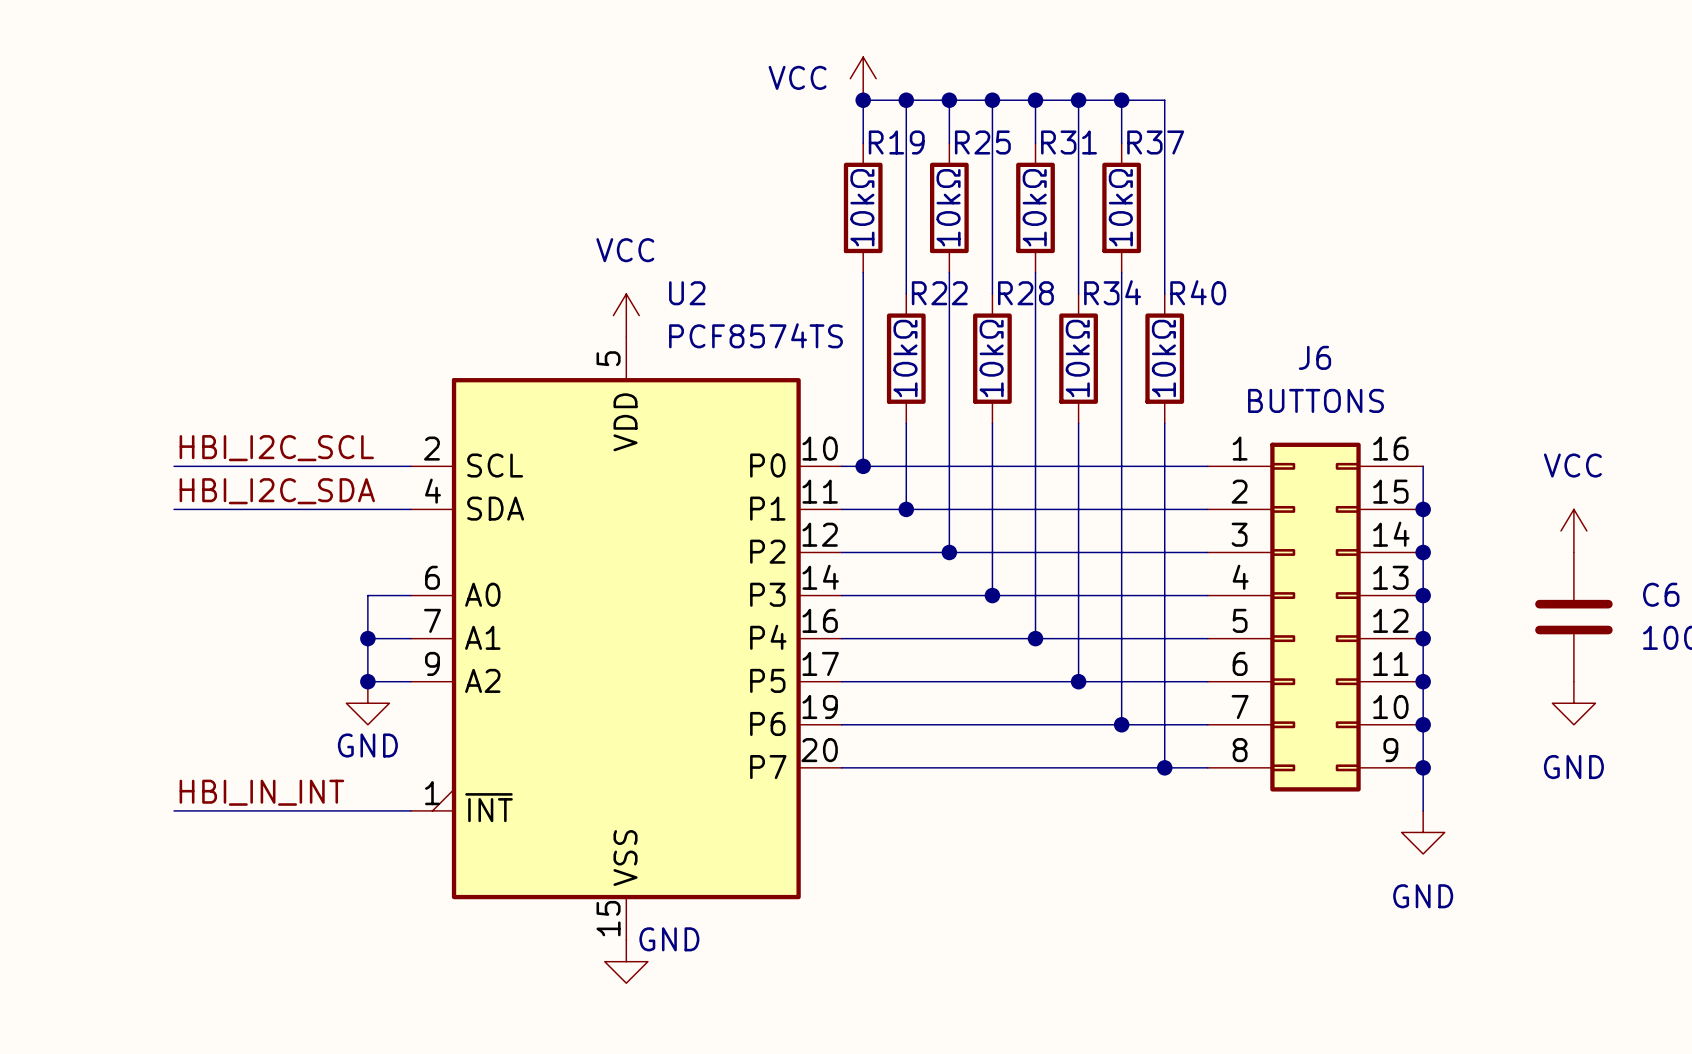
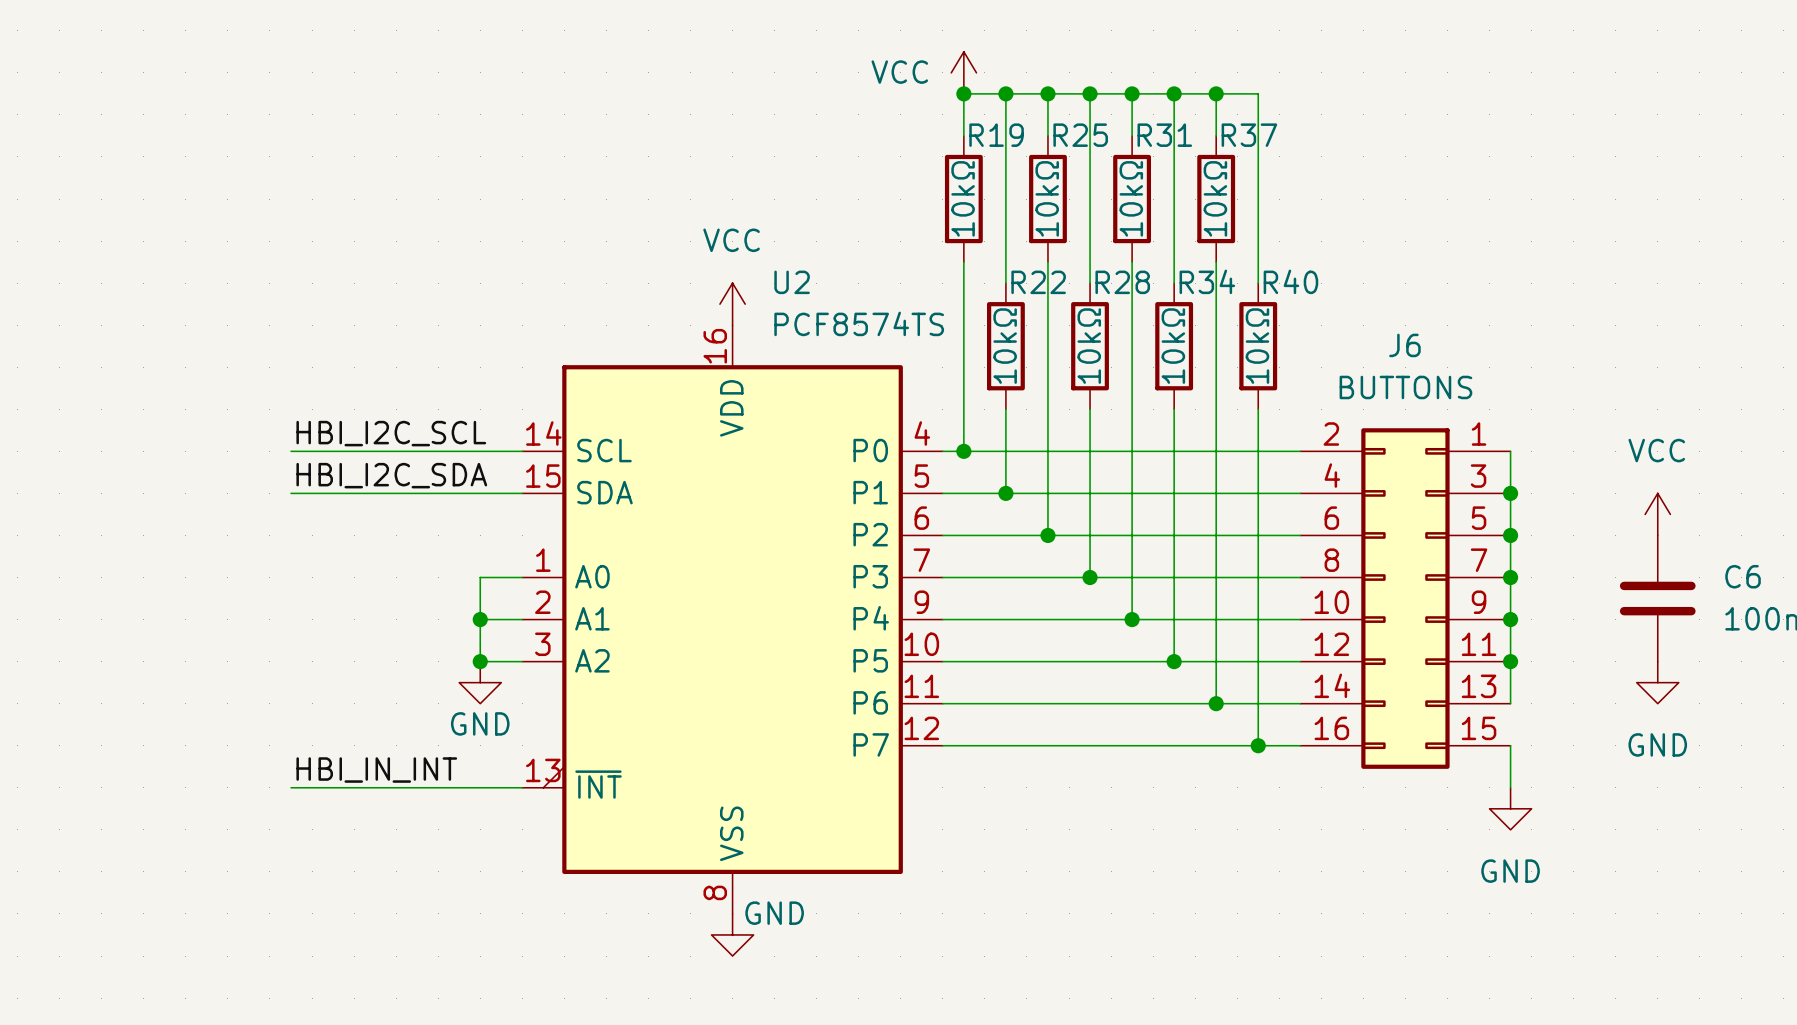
U2 symbol: [410, 337, 842, 941] -> [522, 325, 943, 914]
J6 symbol: [1207, 442, 1424, 792] -> [1300, 428, 1511, 769]
wire: (1423, 724) (1423, 767) -> none
junction: (1423, 724) -> none
junction: (1423, 767) -> none

